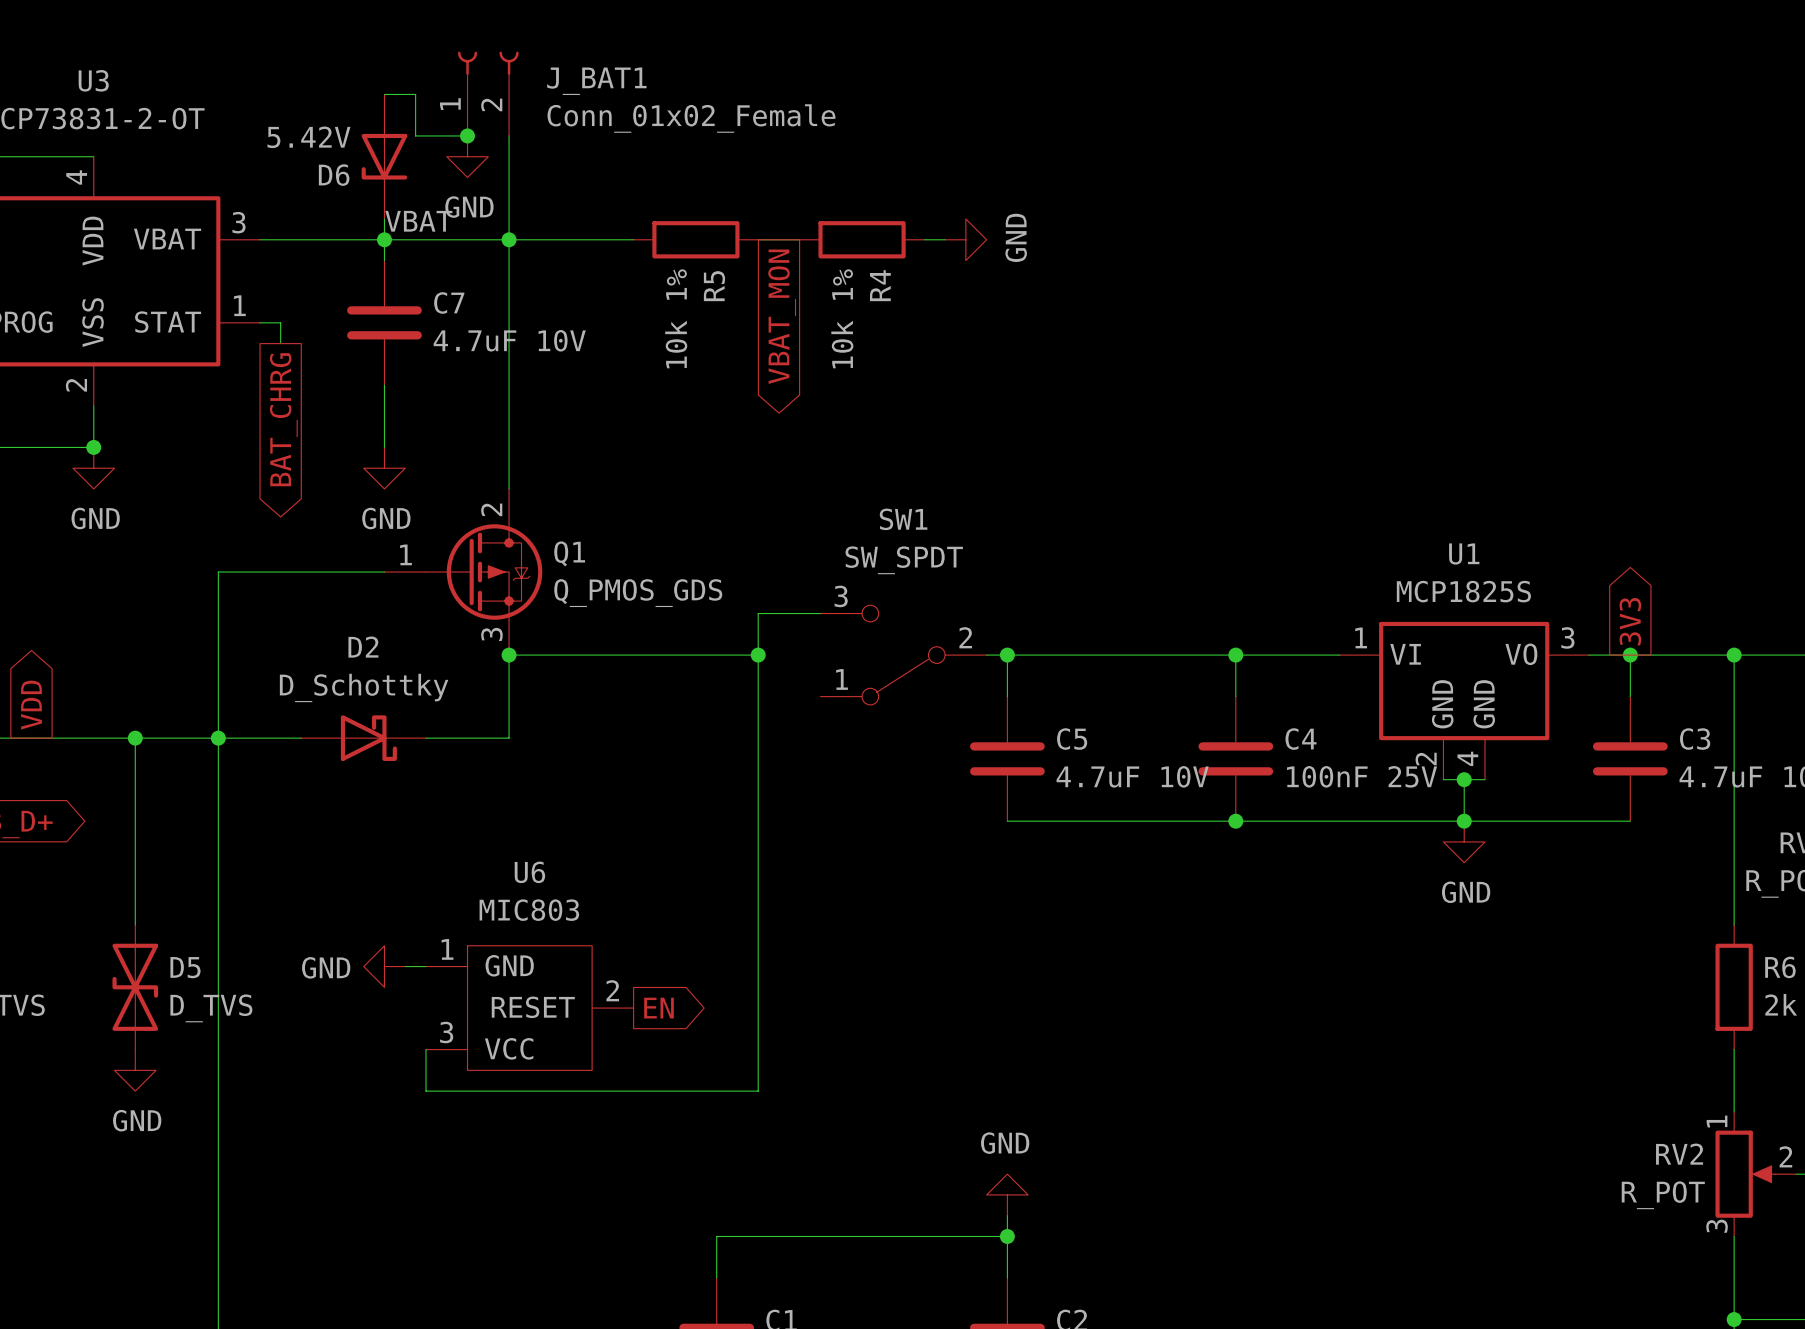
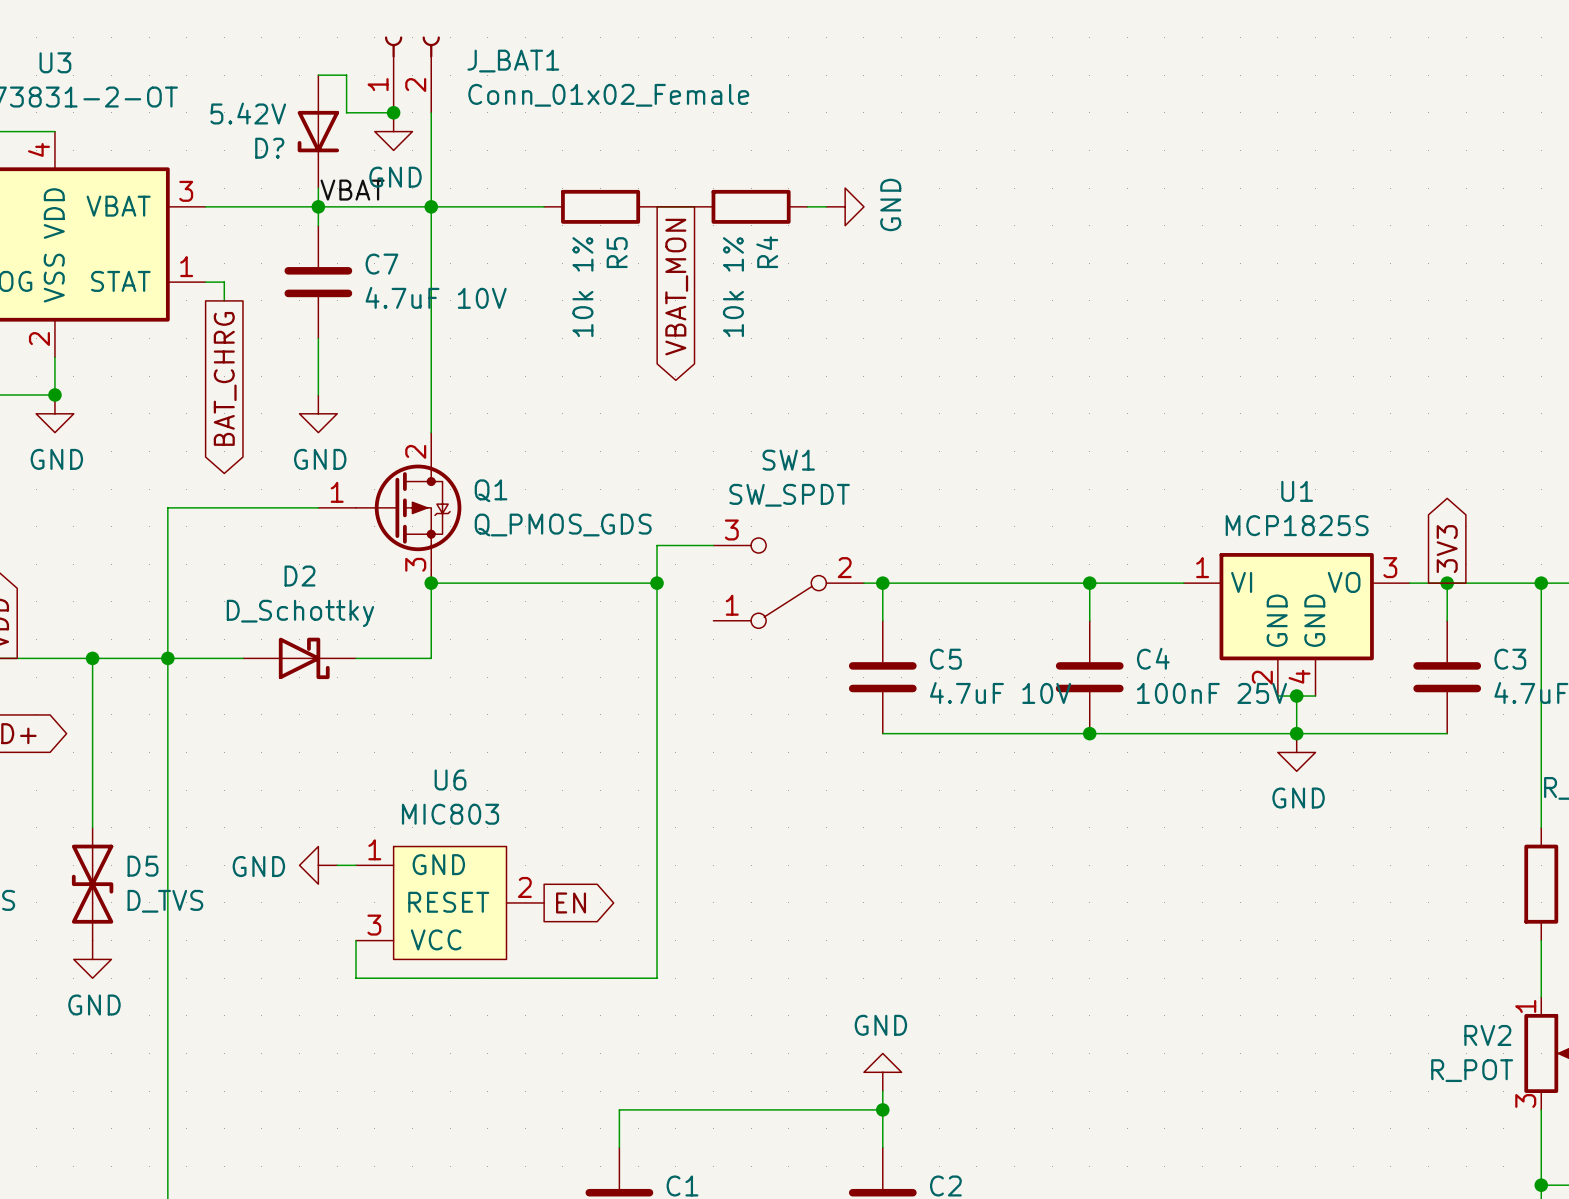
D6 name: D6 (334, 175) -> D? (269, 148)

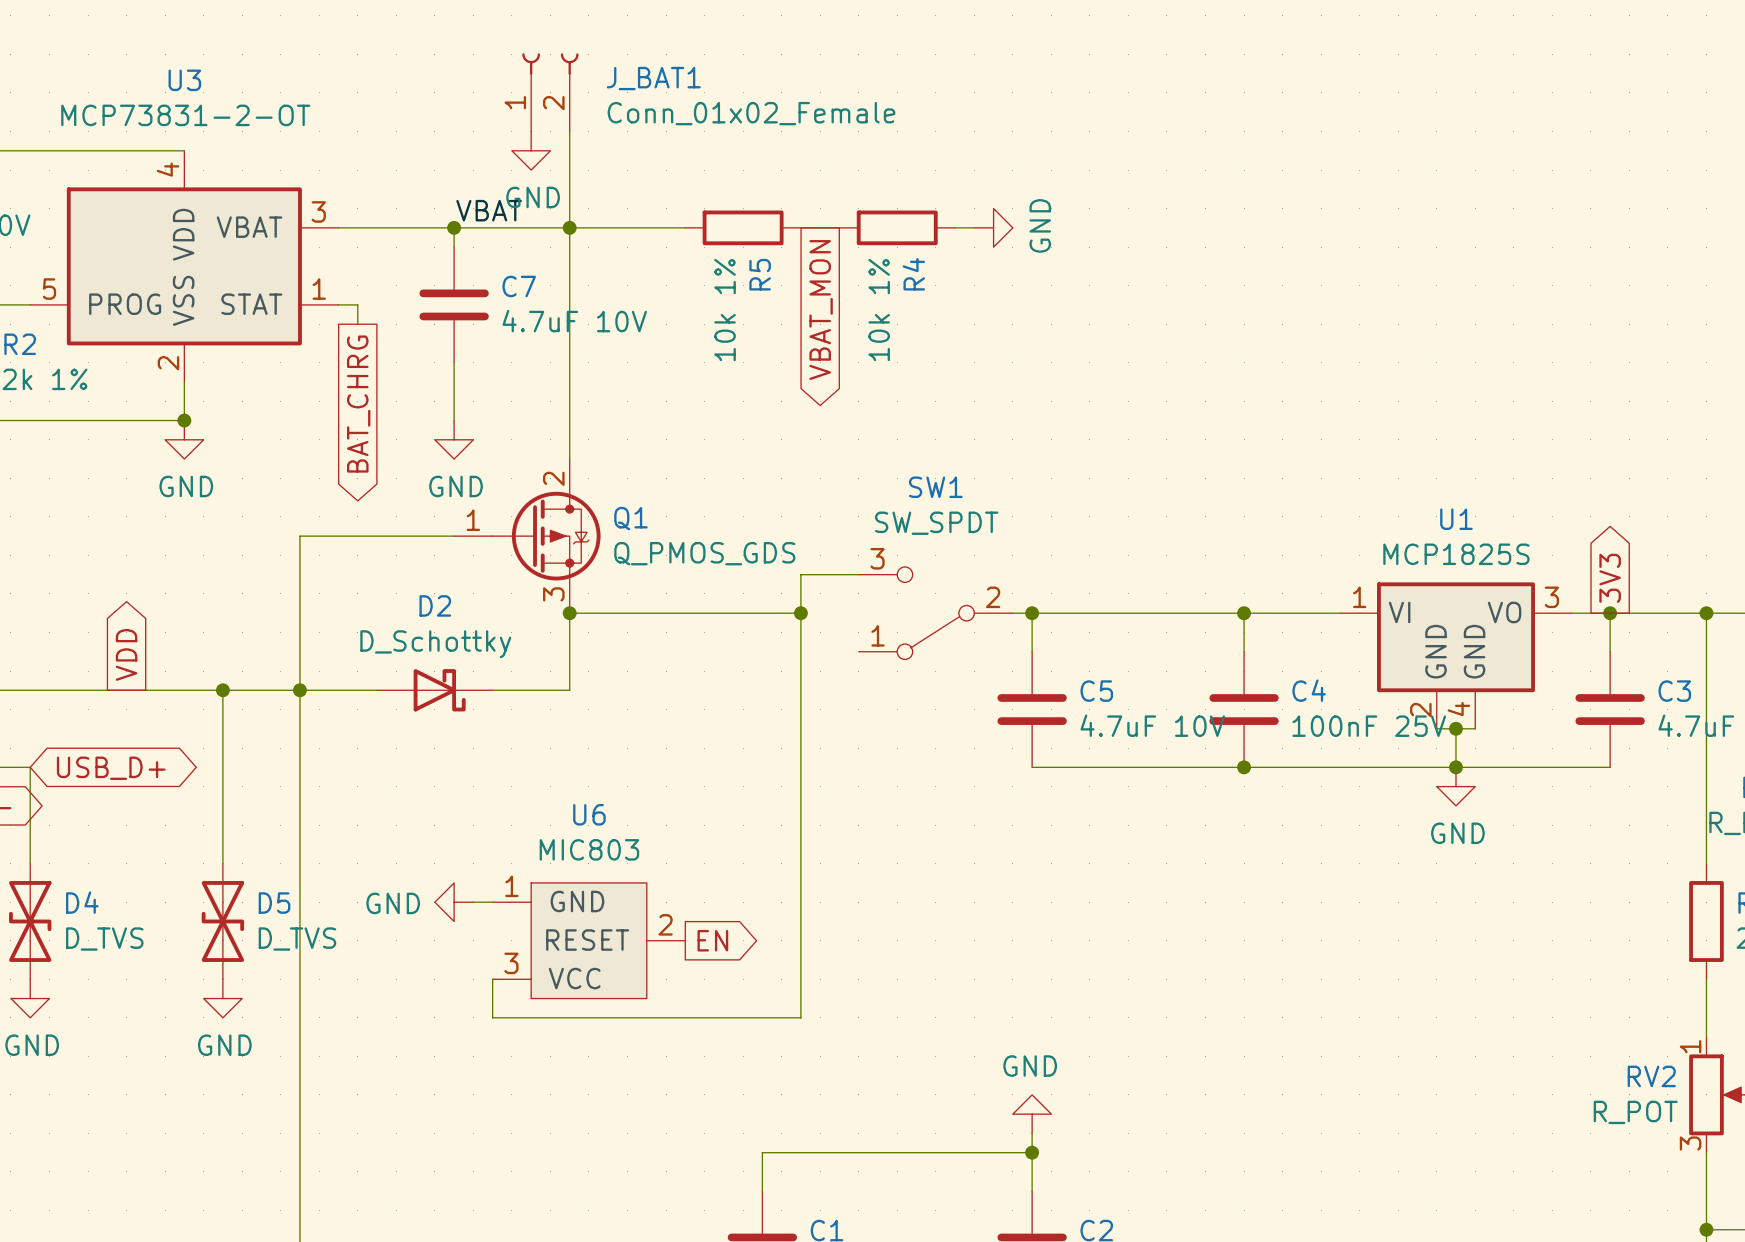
wire: (318, 75) (346, 75) (346, 112) (393, 112) -> none
junction: (393, 112) -> none
D?: 5.42V (318, 131) -> none
wire: (318, 188) (318, 206) -> none

